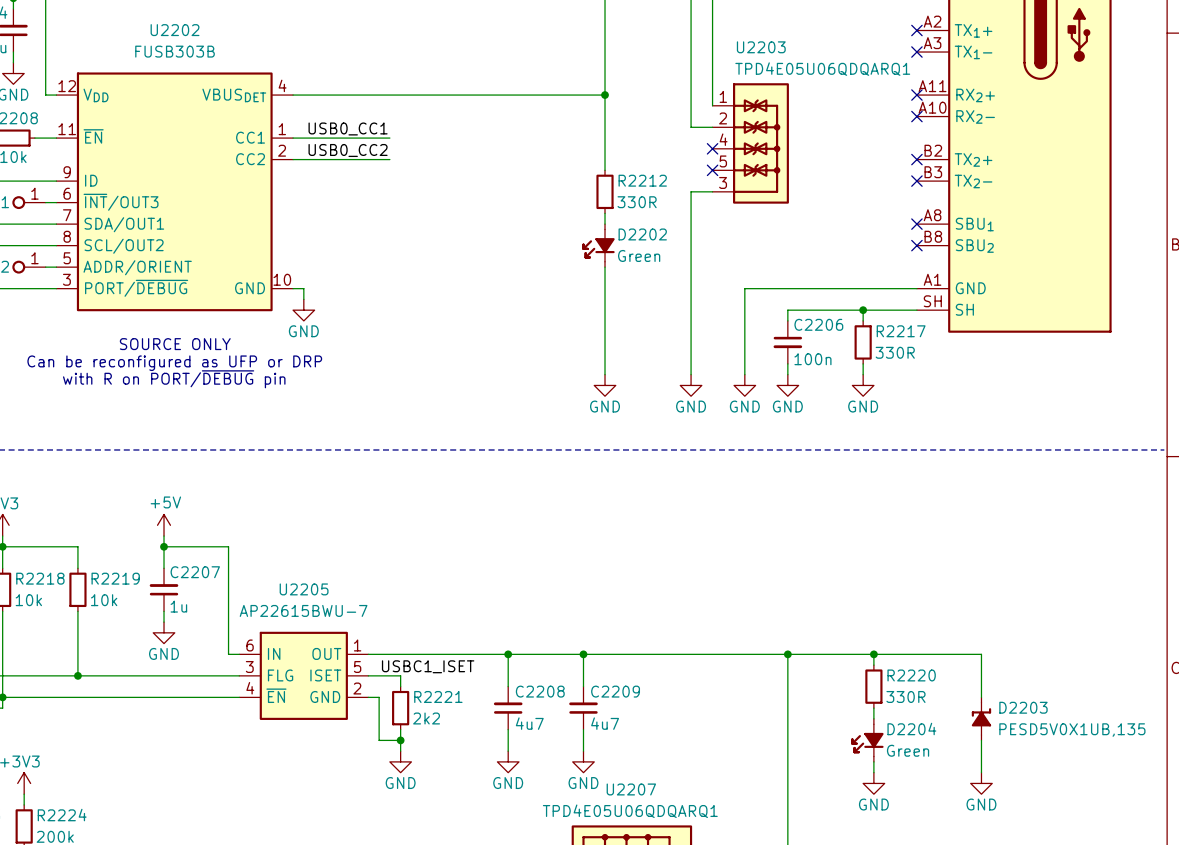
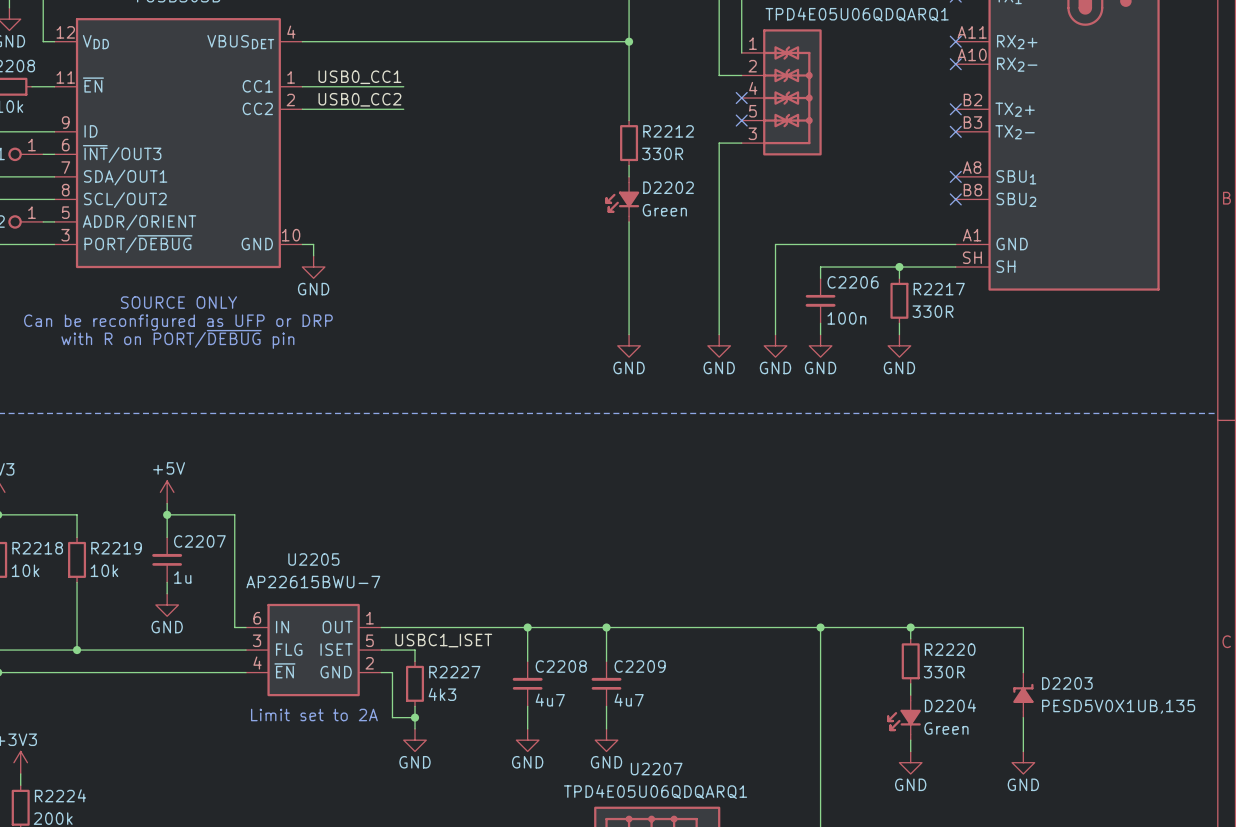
R2221 name: R2221 (438, 696) -> R2227 (454, 672)
R2221 text: 2k2 (426, 718) -> 4k3 (442, 694)
text: none -> Limit set to 2A (314, 715)

